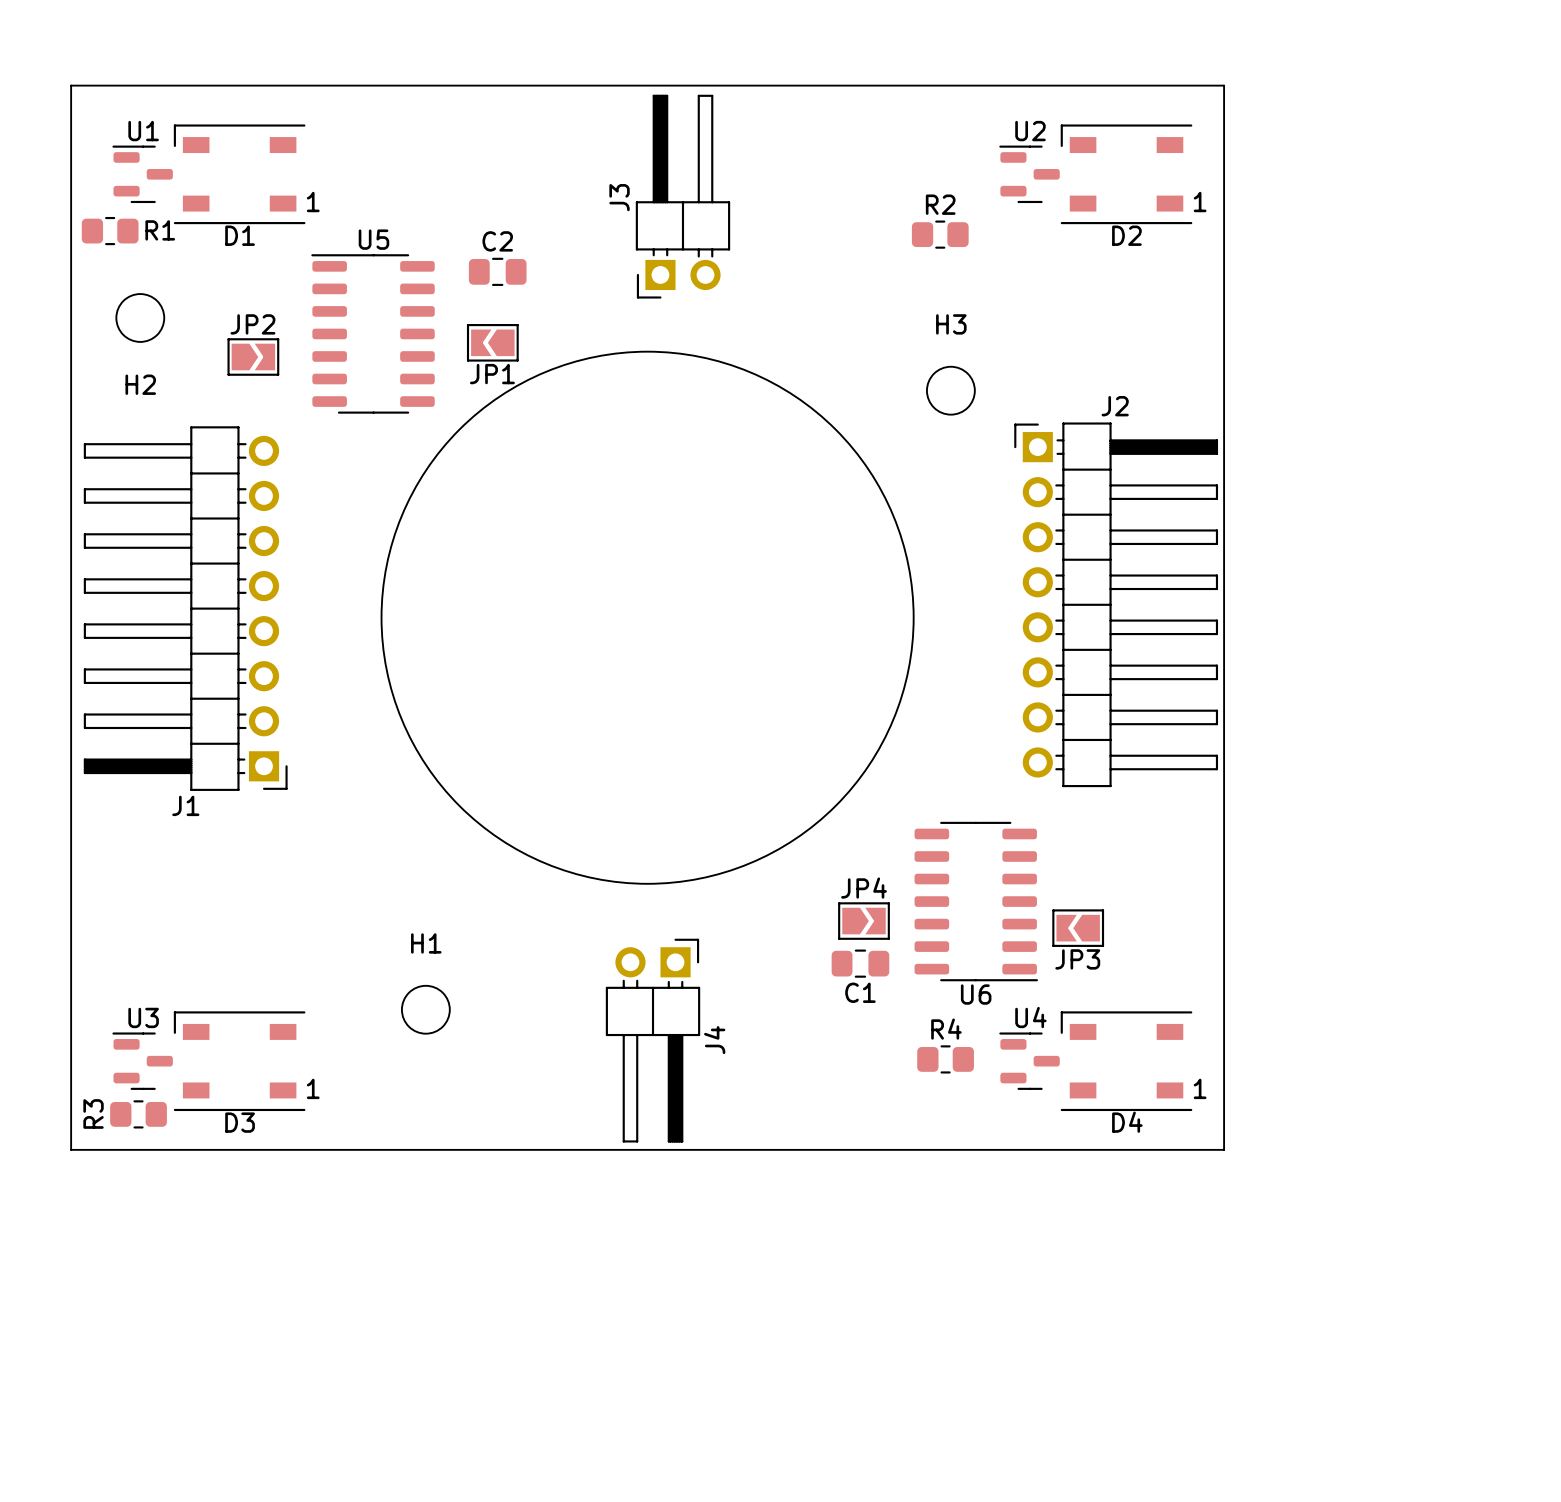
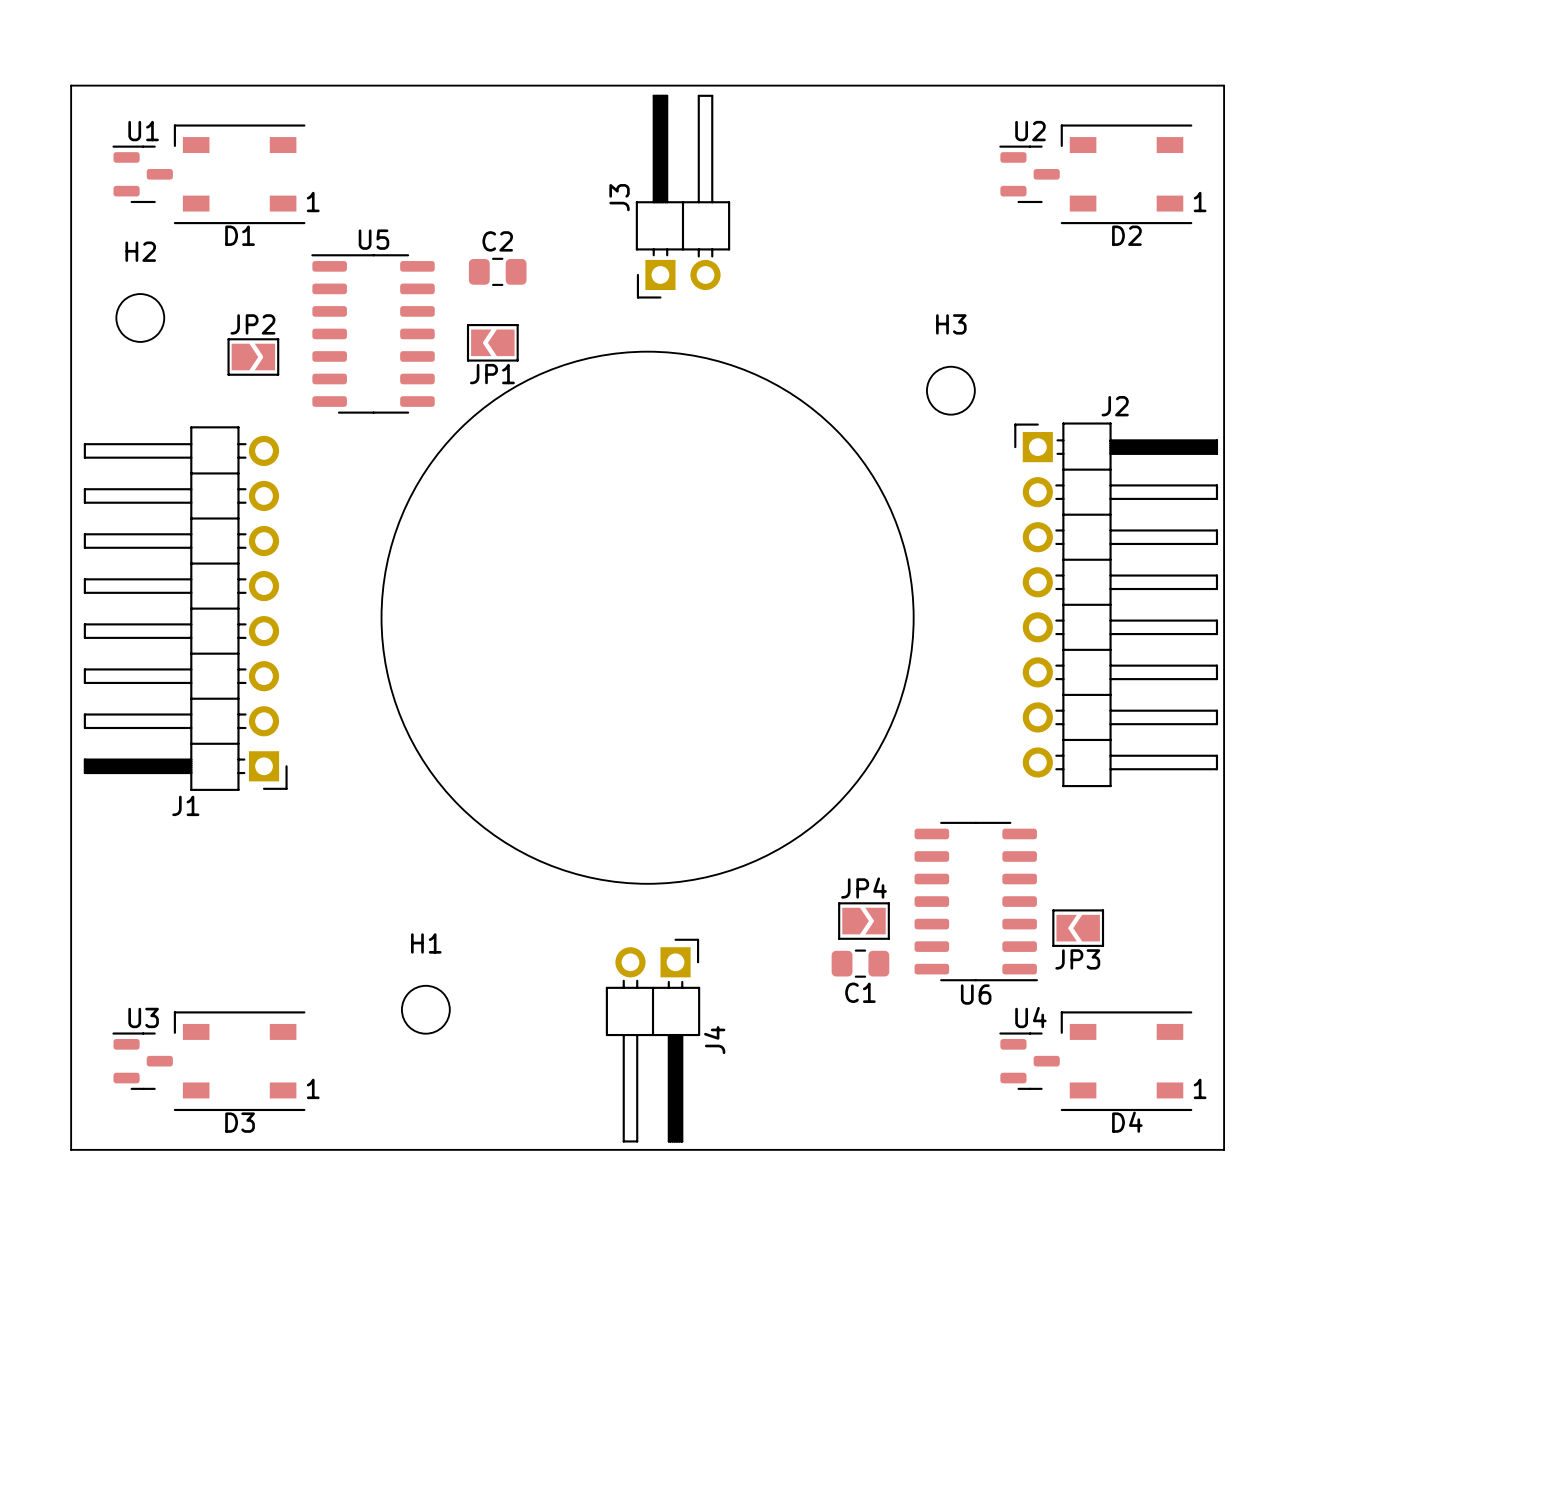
R1: (110, 231) -> none
R2: (940, 234) -> none
H2 name position: H2 (140, 384) -> H2 (140, 251)
R4: (945, 1059) -> none
R3: (138, 1114) -> none

